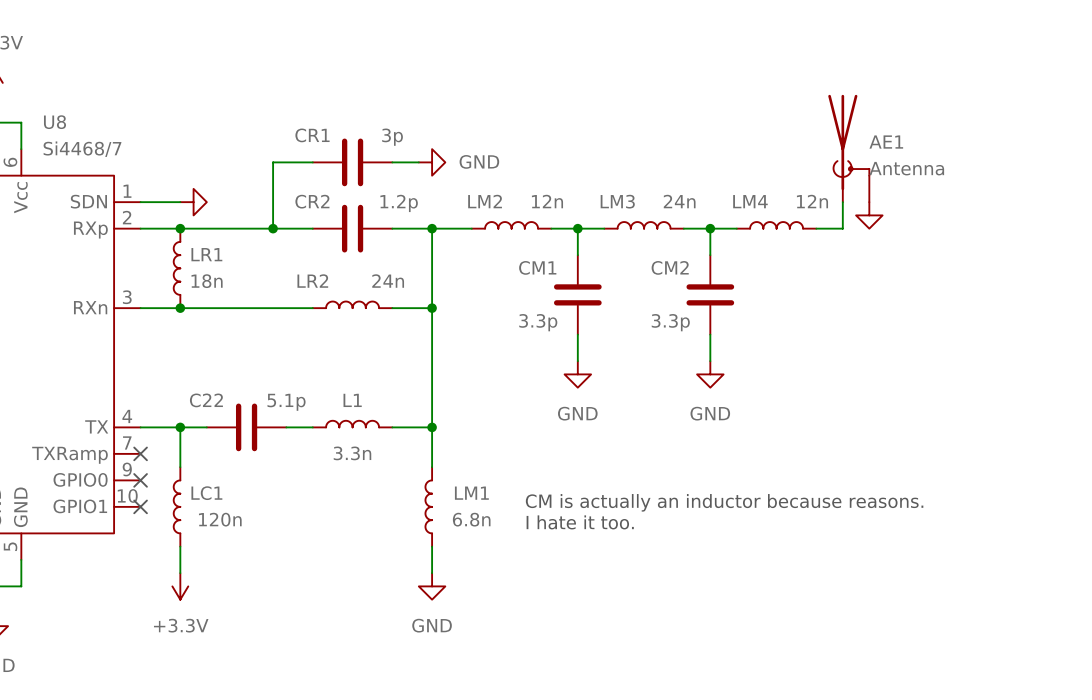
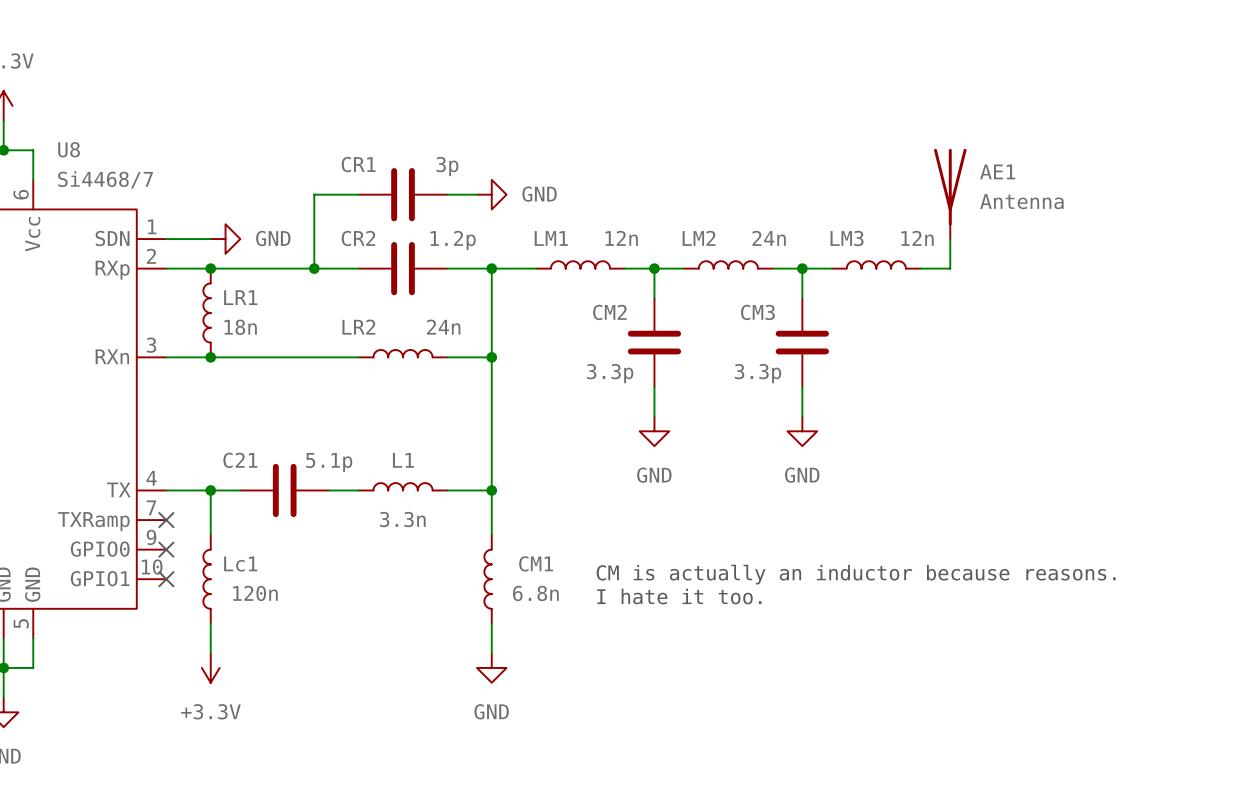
AE1 symbol: [828, 94, 870, 203] -> [934, 148, 967, 240]
power symbol text: none -> GND (273, 238)
LM2 name: LM2 (485, 201) -> LM1 (551, 238)
LM3 name: LM3 (617, 201) -> LM2 (699, 238)
LM4 name: LM4 (750, 201) -> LM3 (847, 238)
power symbol: (869, 215) -> none
CM1 name: CM1 (537, 267) -> CM2 (609, 312)
CM2 name: CM2 (670, 267) -> CM3 (757, 312)
C22 name: C22 (206, 400) -> C21 (240, 460)
LC1 name: LC1 (206, 493) -> Lc1 (240, 564)
LM1 name: LM1 (471, 493) -> CM1 (536, 563)

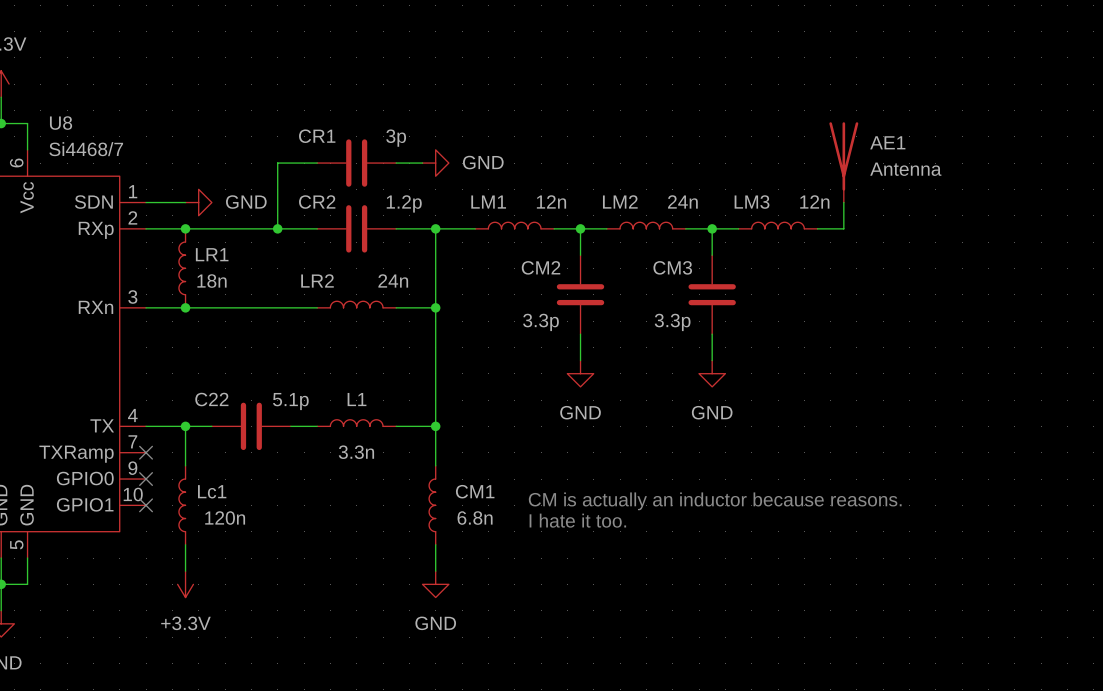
C21 name: C21 (240, 460) -> C22 (211, 399)

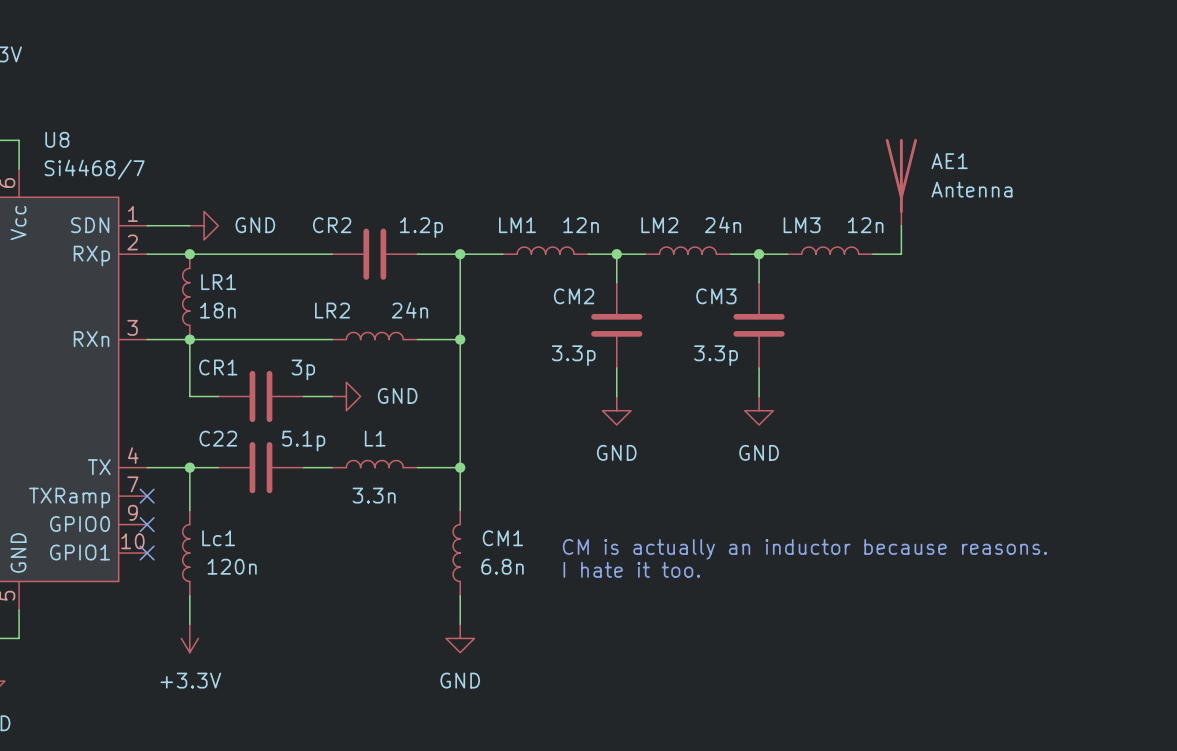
wire: (317, 163) (277, 163) (277, 228) -> none
CR1 position: (356, 163) -> (260, 396)
wire: (396, 163) (422, 163) -> (303, 396) (332, 396)
power symbol position: GND (435, 163) -> GND (346, 396)
junction: (277, 228) -> none
wire: none -> (189, 339) (189, 396) (218, 396)

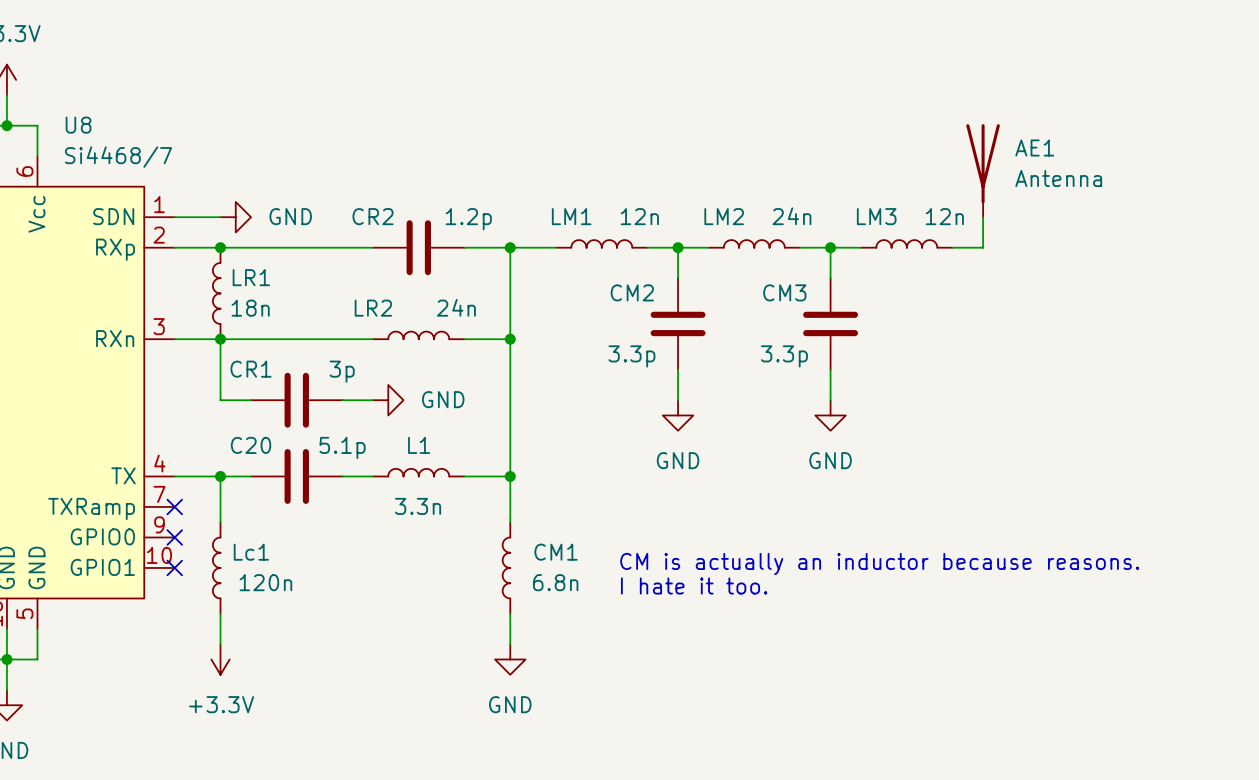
C22 name: C22 (218, 438) -> C20 (251, 445)

